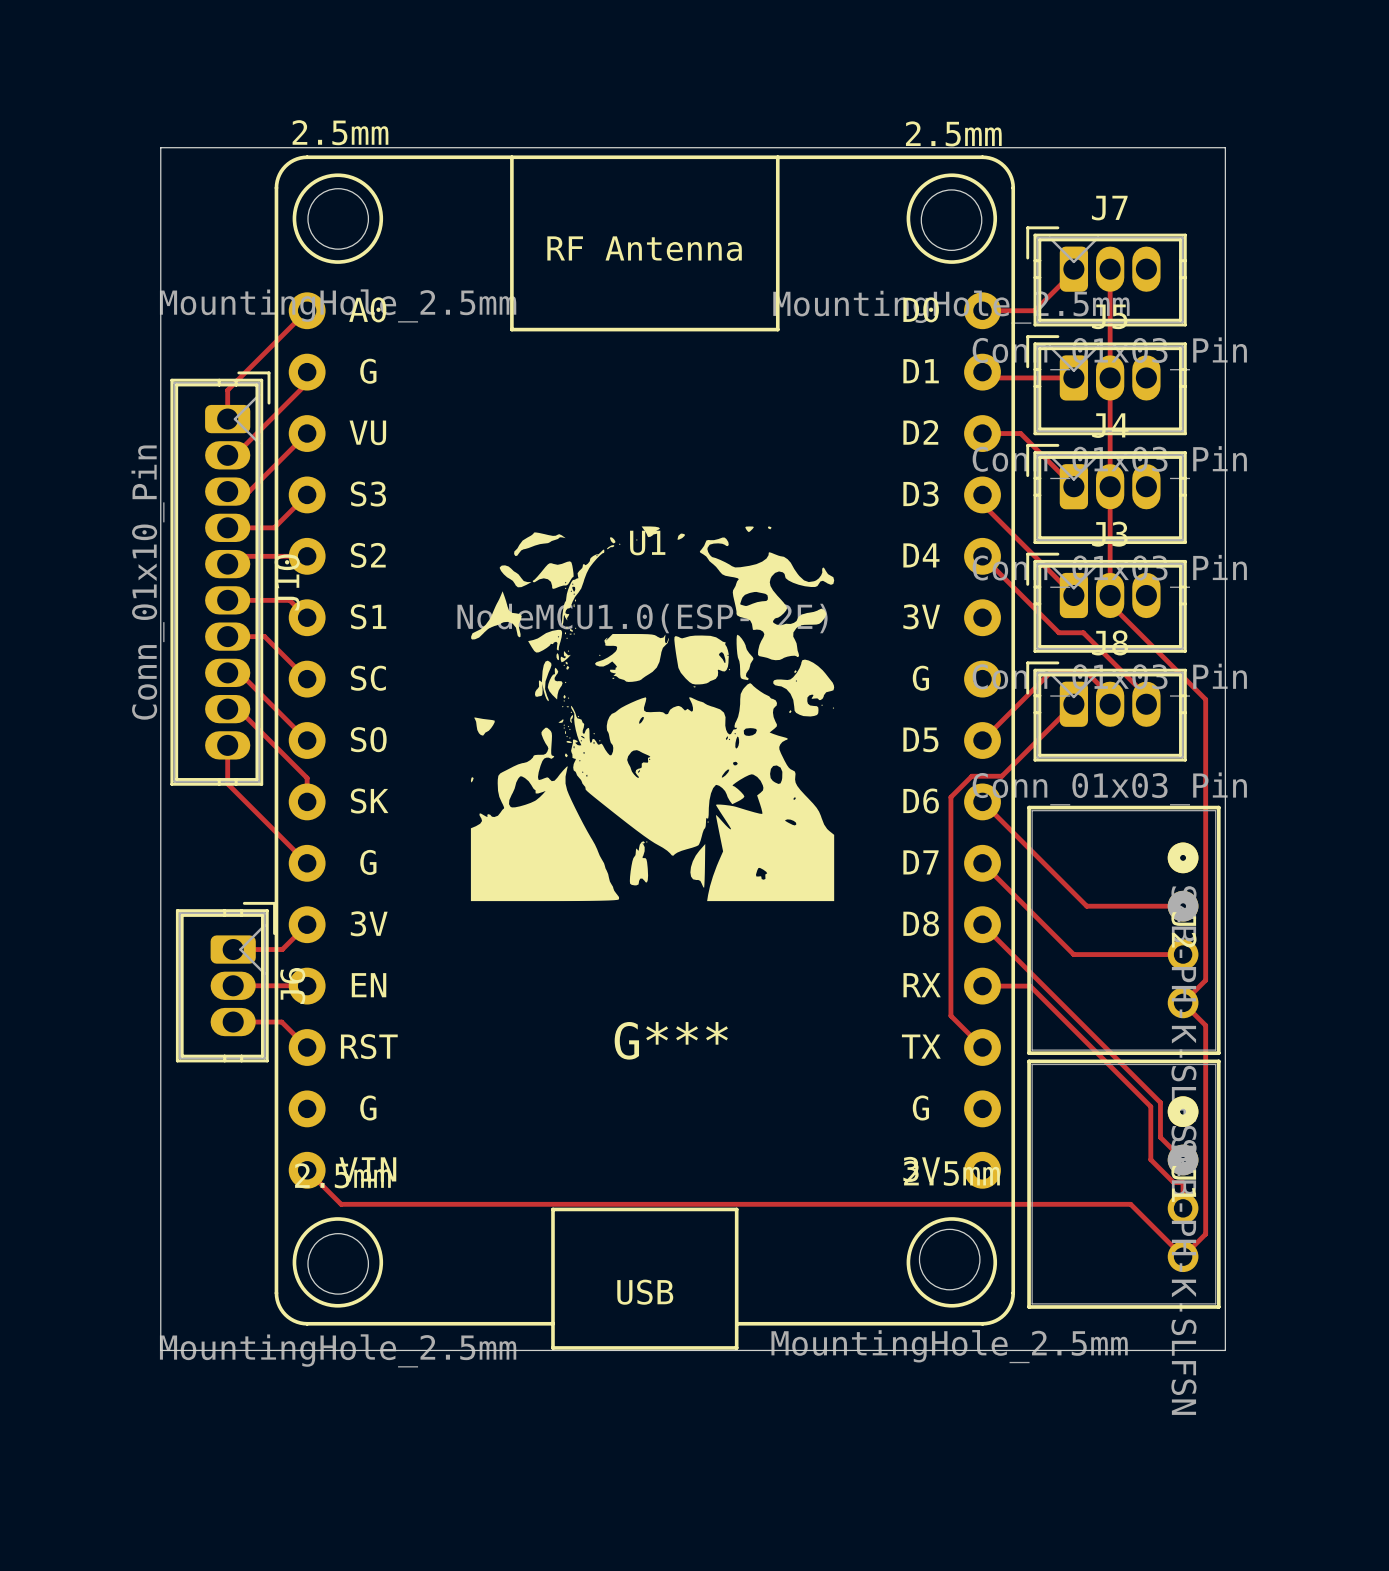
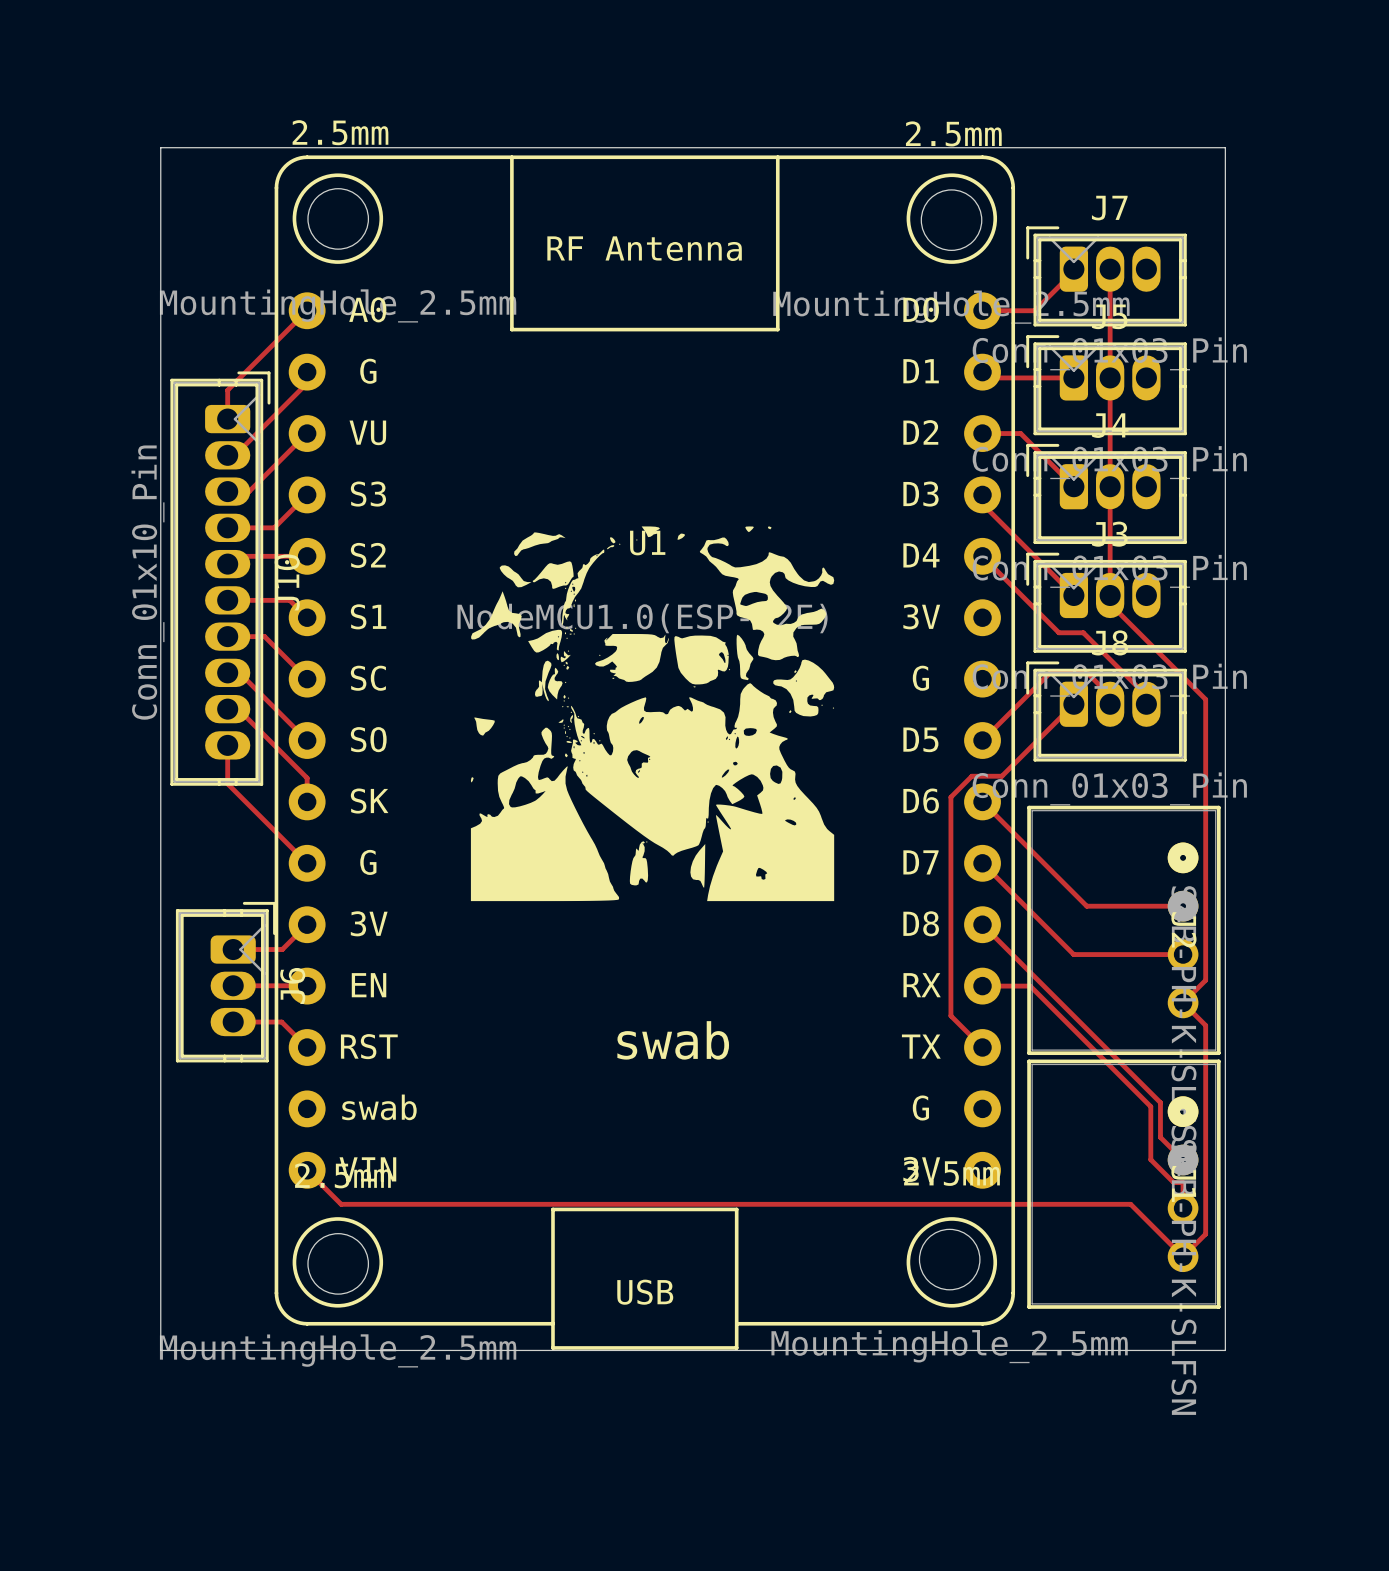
G*** name: G*** (671, 1040) -> swab (673, 1040)
U1 text: none -> swab (379, 1107)
U1 text: G (368, 1108) -> none

